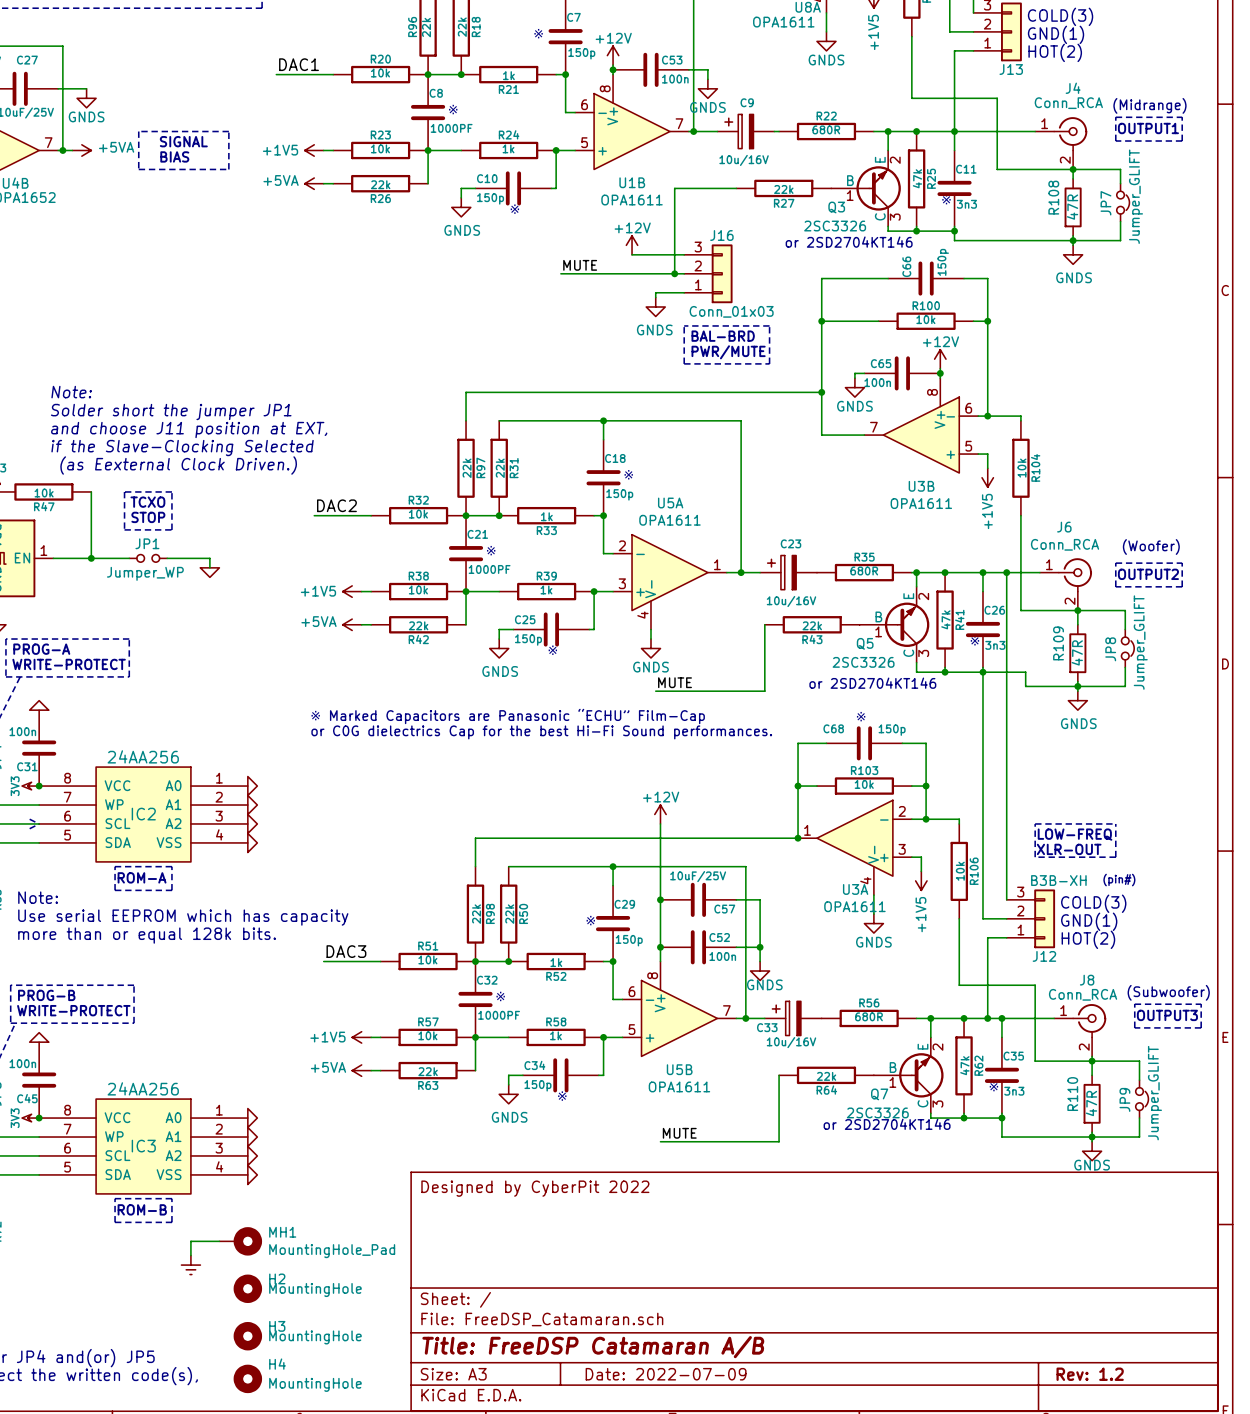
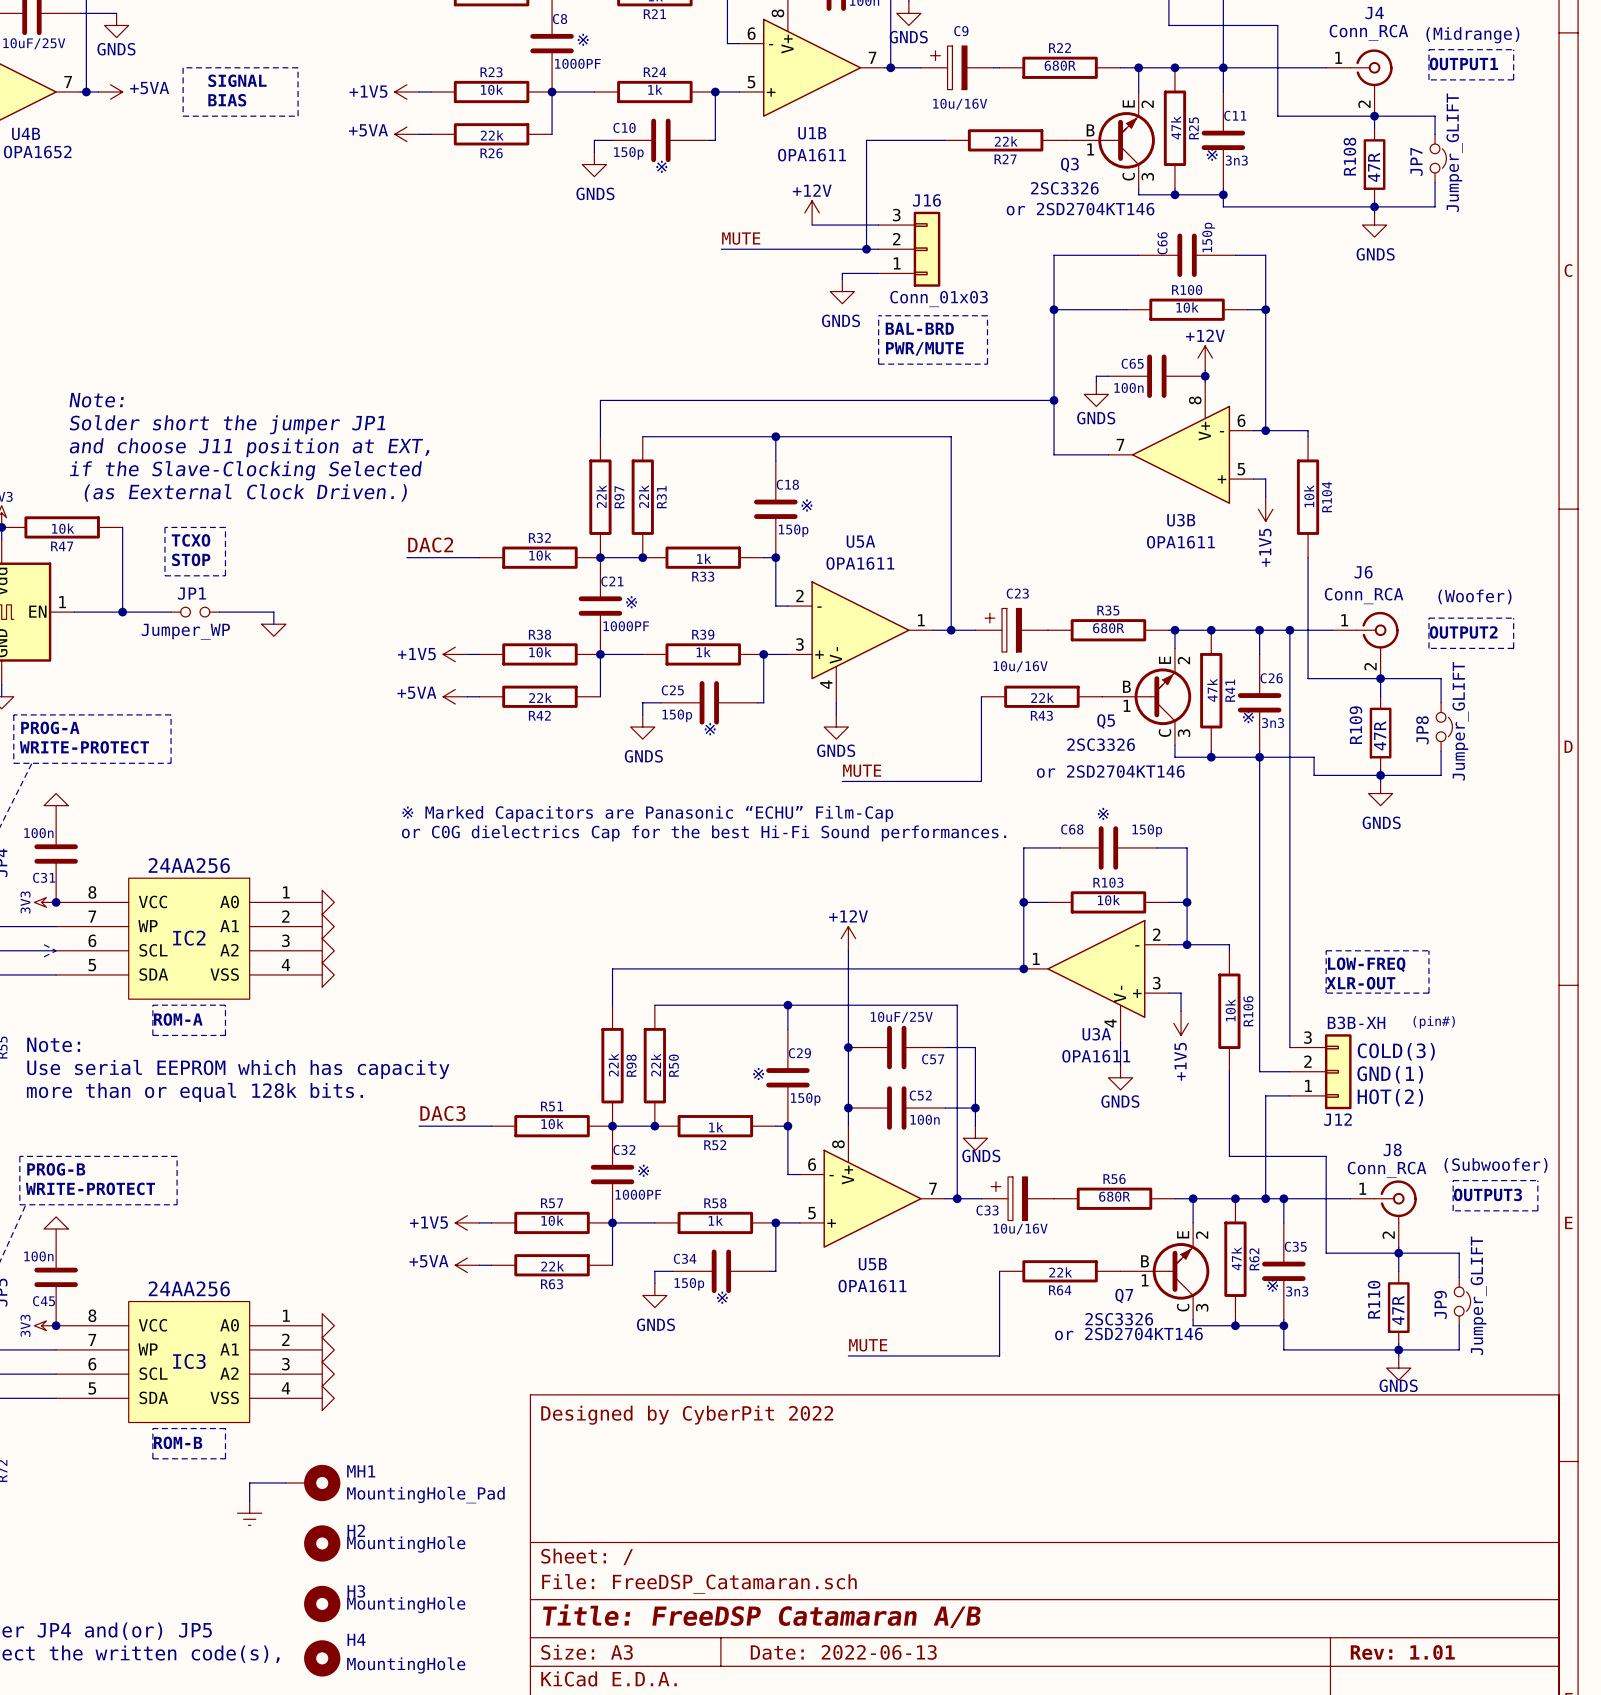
title block: Date: 2022-07-09 (666, 1374) -> Date: 2022-06-13 (843, 1652)
title block: Rev: 1.2 (1090, 1374) -> Rev: 1.01 (1402, 1652)

